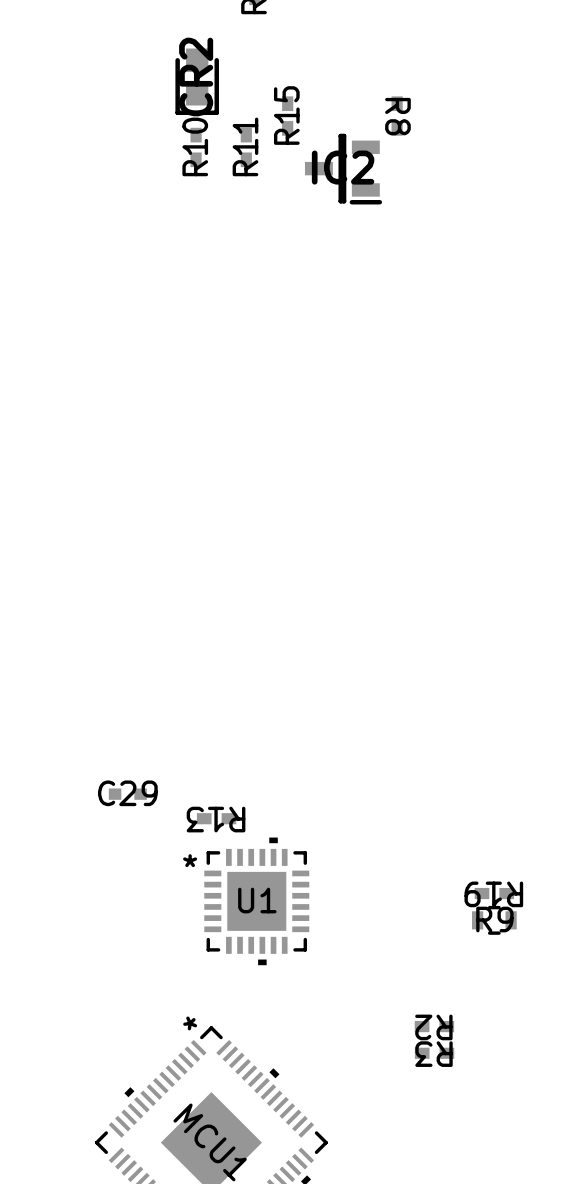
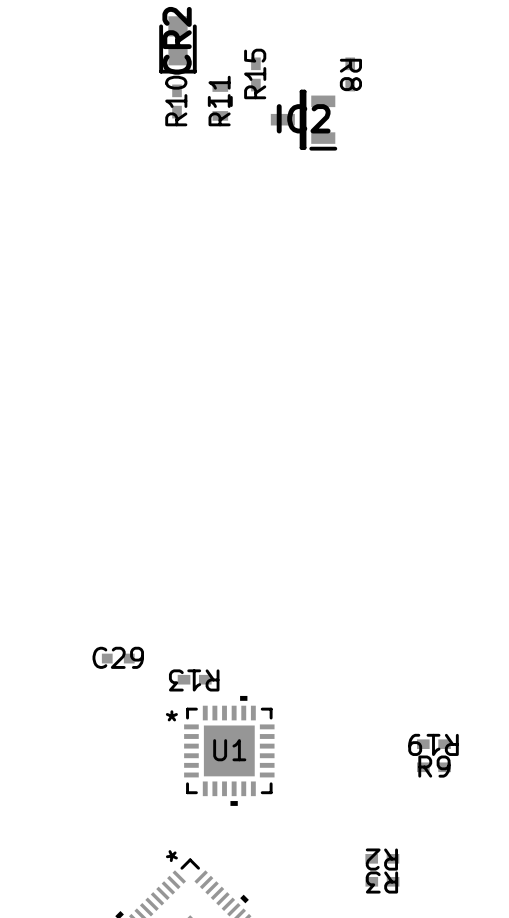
R11 footprint: [240, 127, 252, 168] -> [207, 82, 233, 121]
R9 footprint: [472, 905, 517, 935] -> [417, 762, 451, 773]

